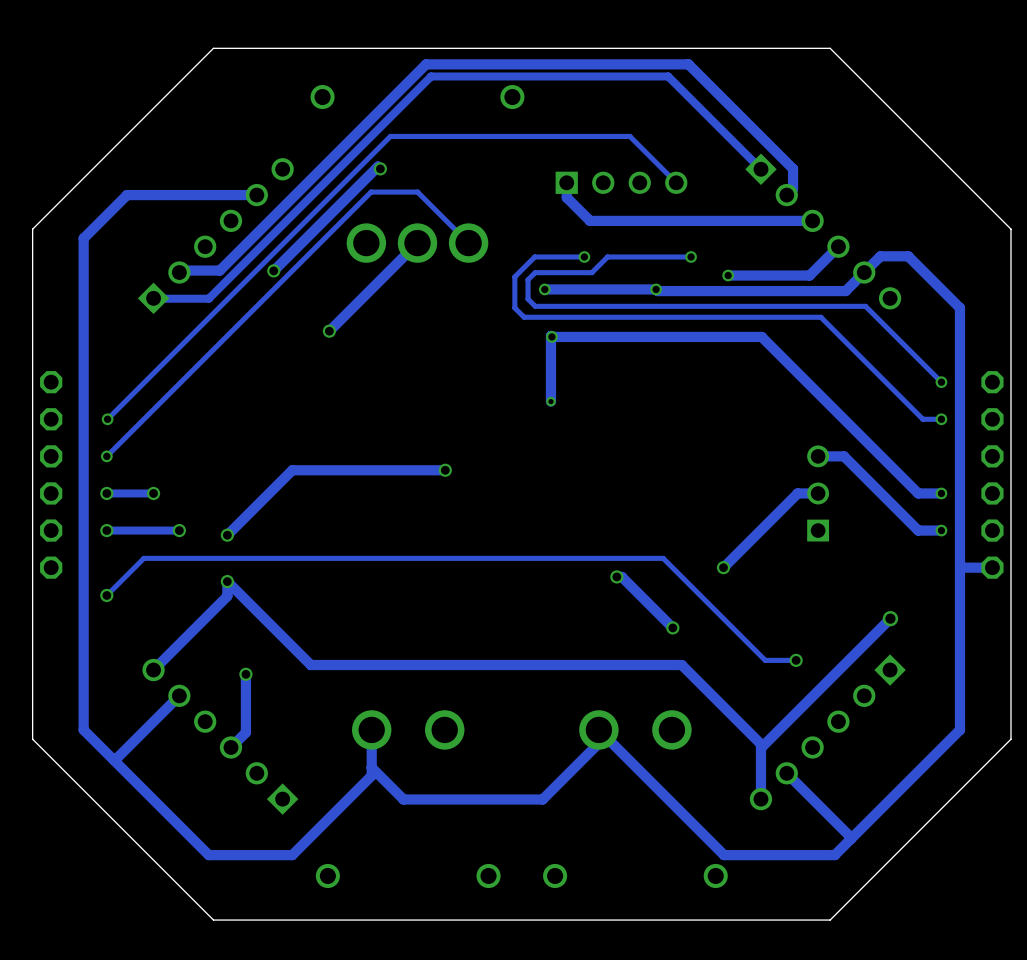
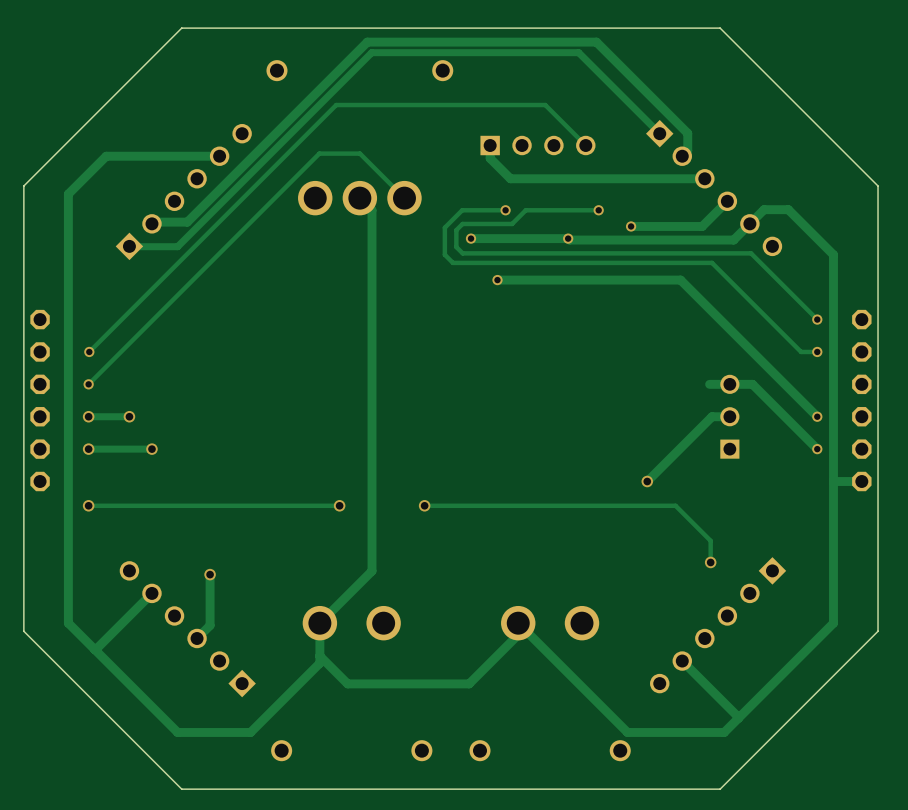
track: (380, 168) (378, 166) (273, 270) -> none
via: (380, 168) -> none
track: (417, 243) (329, 331) -> (359, 198) (372, 210) (372, 571) (319, 623)
via: (273, 270) -> none
via: (329, 331) -> none
via position: (551, 336) -> (497, 280)
track: (575, 336) (550, 335) (550, 401) -> none
track: (761, 336) (918, 493) (941, 493) -> (660, 280) (680, 280) (817, 416)
via: (550, 401) -> none
track: (844, 456) (918, 530) (941, 530) -> (732, 384) (752, 384) (817, 449)
track: (445, 470) (292, 470) (227, 535) -> none
via: (445, 470) -> none
track: (818, 493) (797, 493) (723, 567) -> (729, 416) (712, 416) (647, 481)
part position: (818, 493) -> (729, 416)
via: (227, 535) -> none
via position: (723, 567) -> (647, 481)
track: (616, 576) (621, 576) (672, 627) -> none
via: (616, 576) -> none
via: (227, 581) -> none
track: (106, 595) (143, 558) (663, 558) (765, 660) (796, 660) -> (88, 505) (339, 505)
via: none -> (339, 505)
track: none -> (424, 505) (675, 505) (710, 540) (710, 562)
via: none -> (424, 505)
track: (890, 618) (760, 748) -> none
via: (890, 618) -> none
via: (672, 627) -> none
via position: (796, 660) -> (710, 562)
track: (153, 670) (227, 596) (227, 581) (310, 665) (681, 665) (760, 744) (760, 799) -> none

